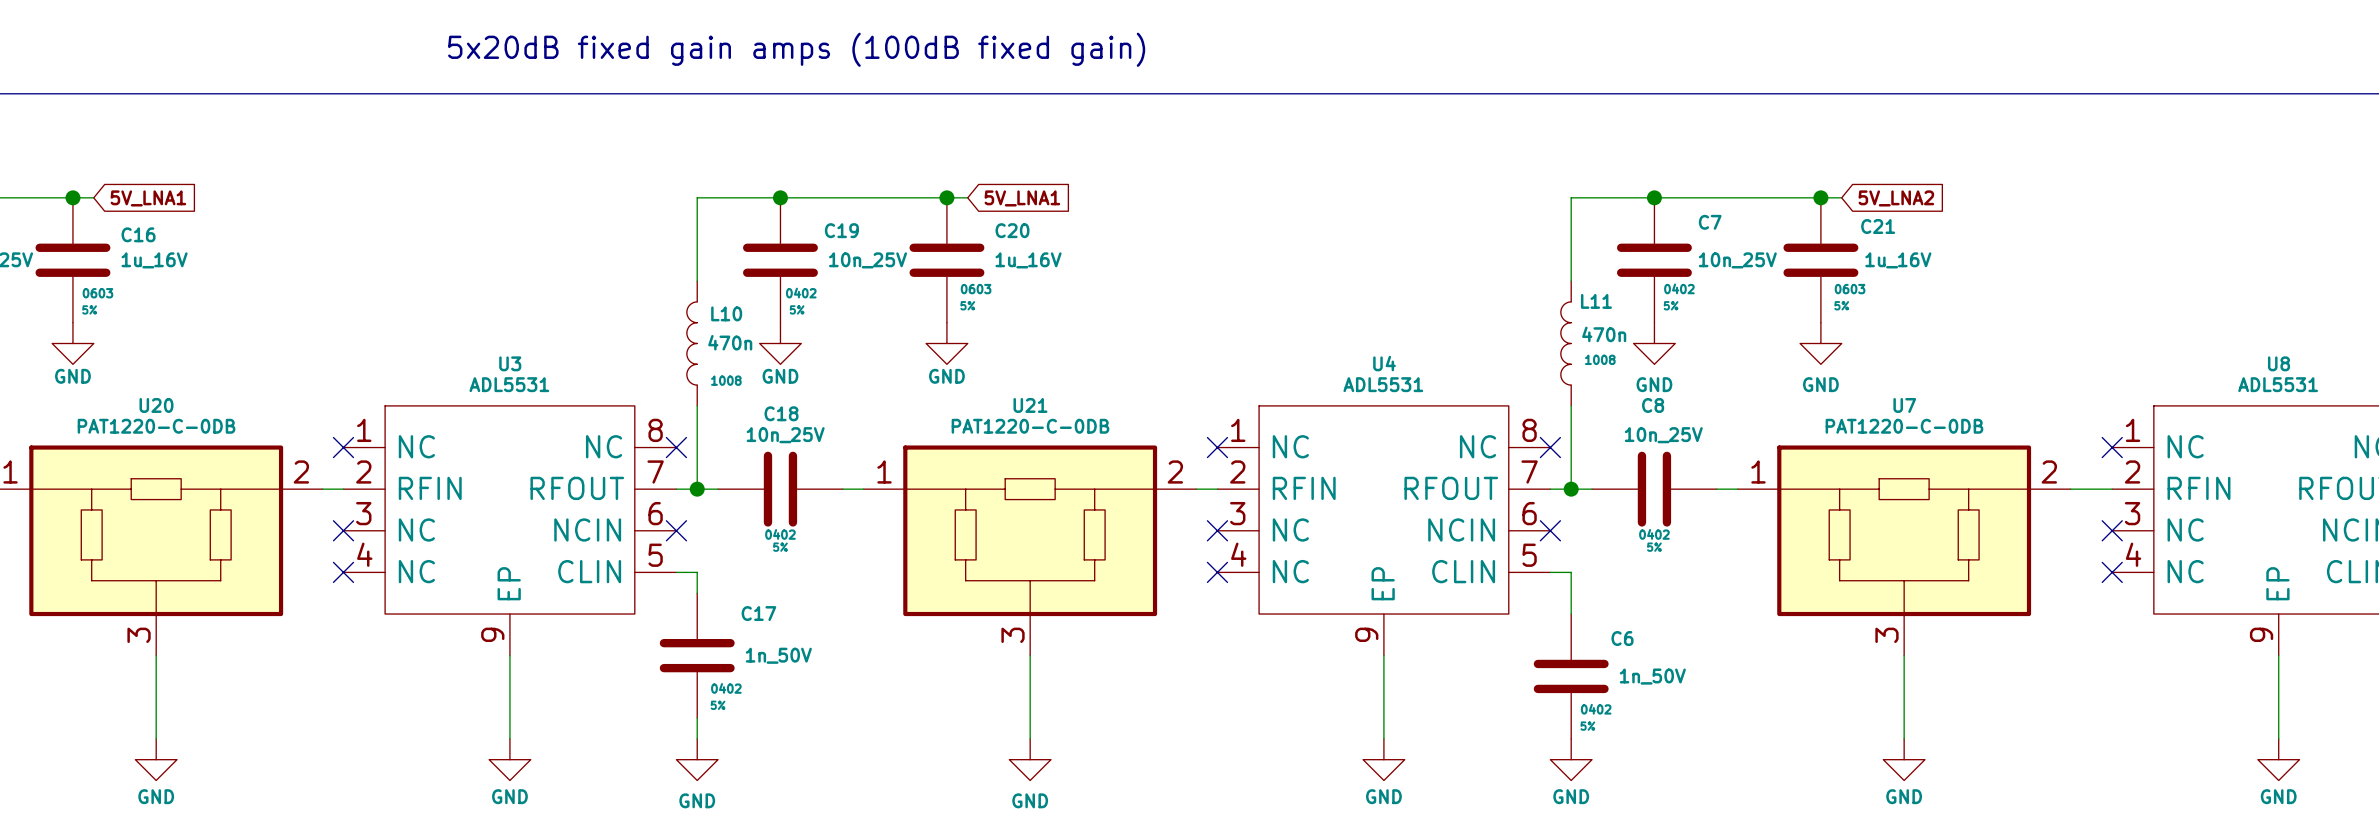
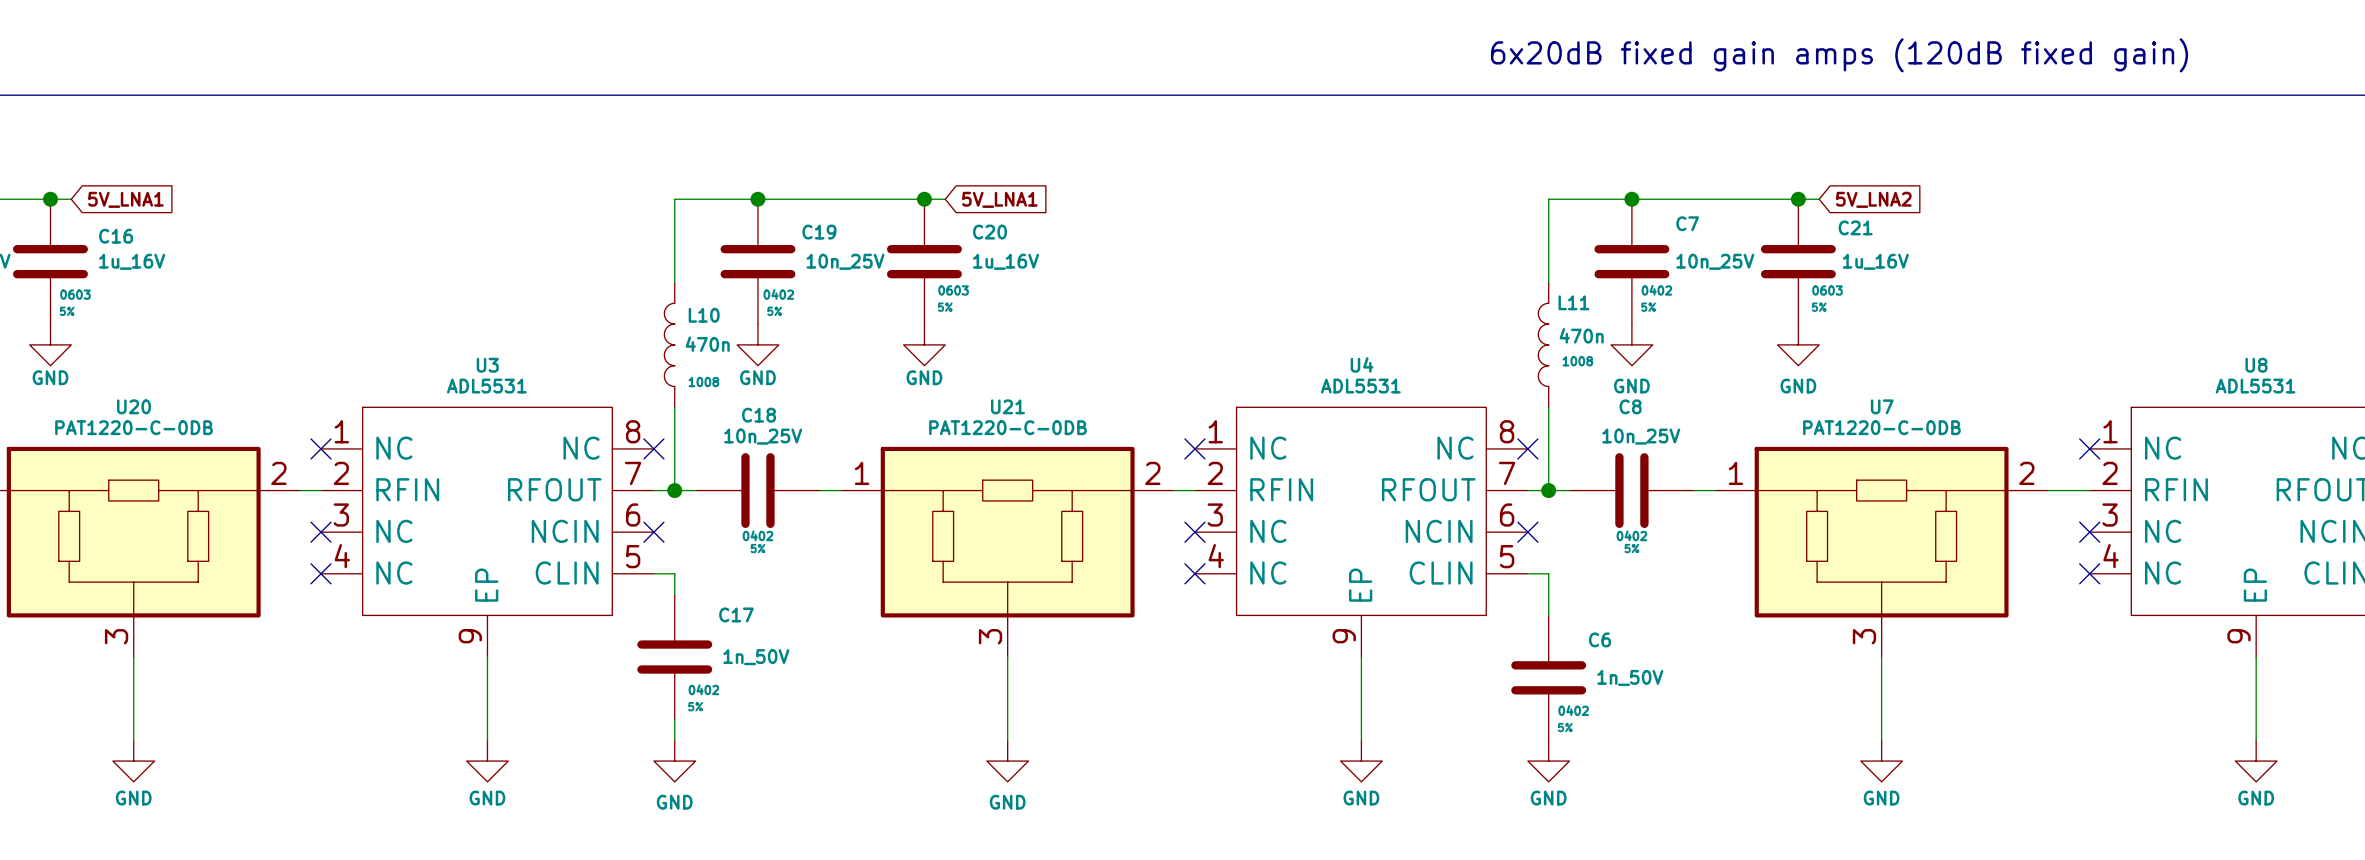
text: 5x20dB fixed gain amps (100dB fixed gain) (796, 49) -> none
text: none -> 6x20dB fixed gain amps (120dB fixed gain) (1839, 55)

